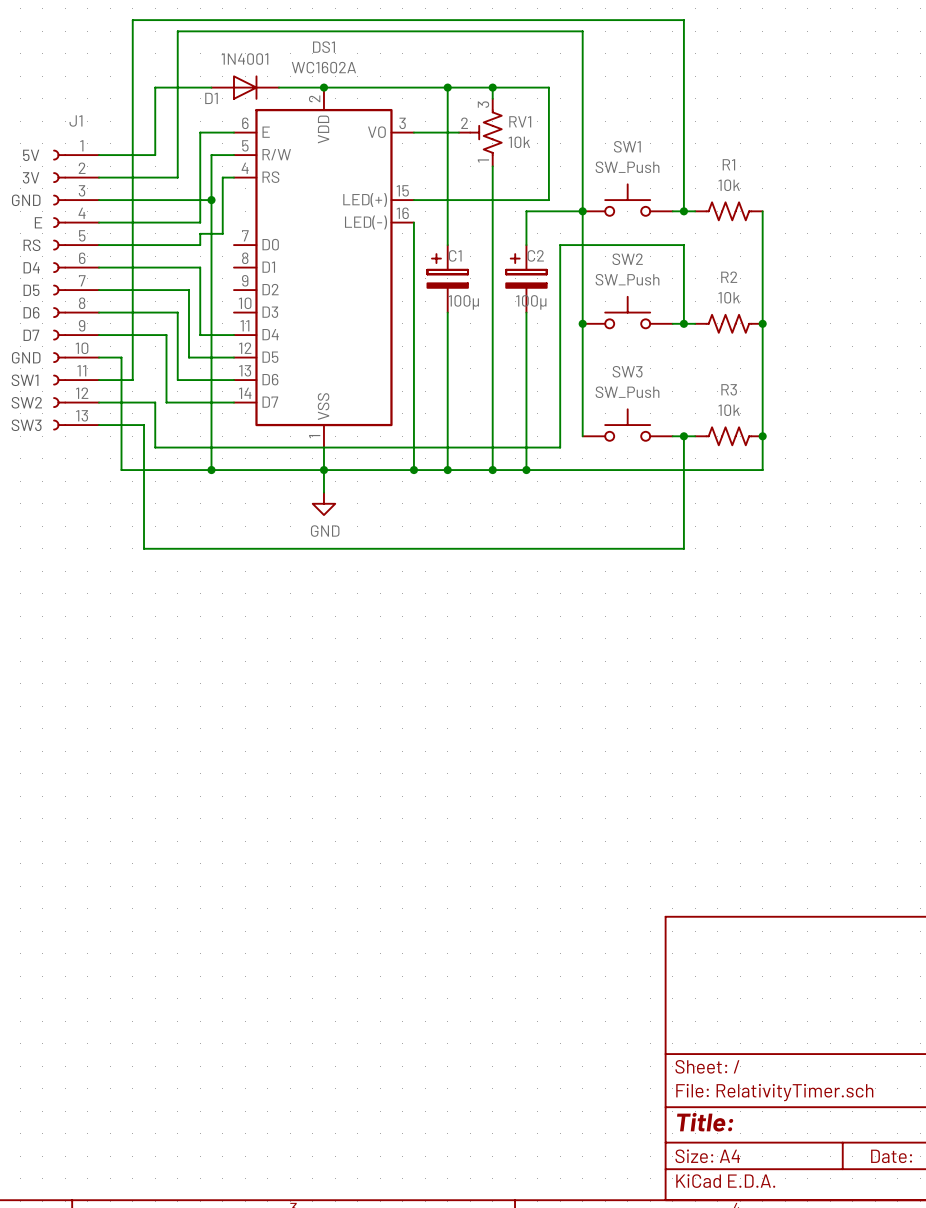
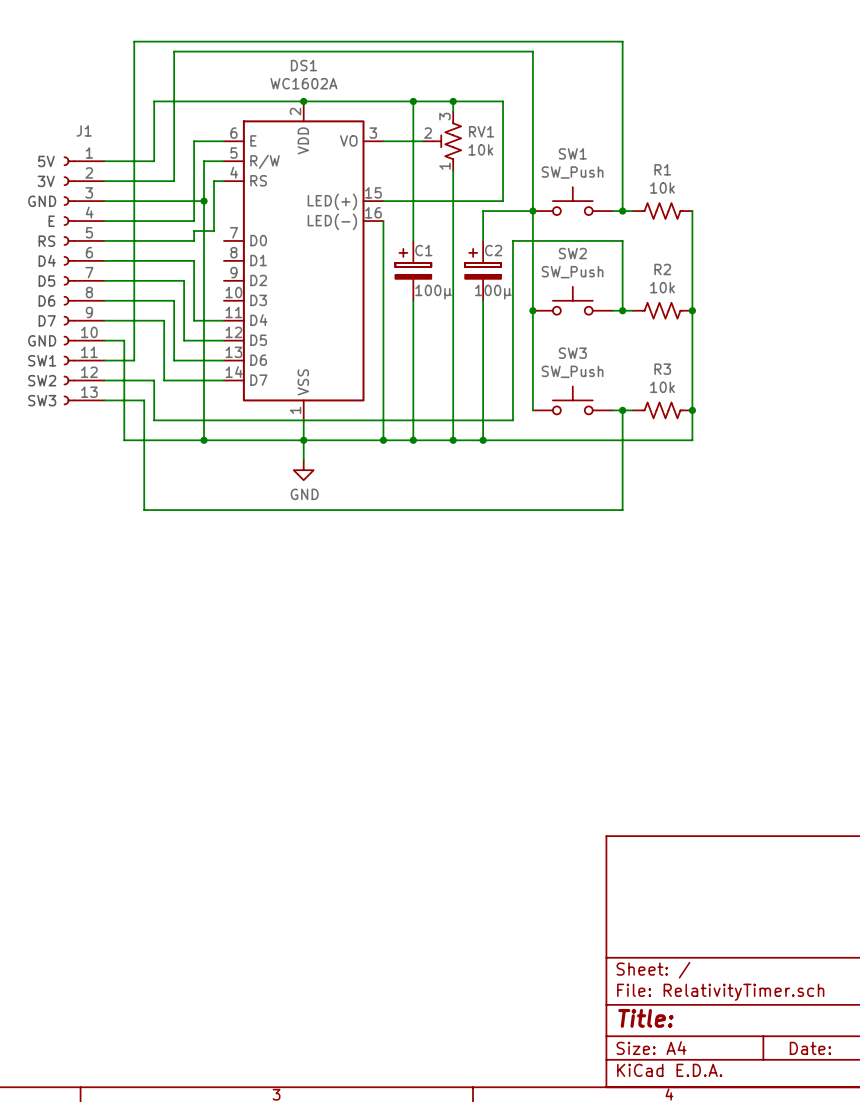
D1: 1N4001 (245, 87) -> none

